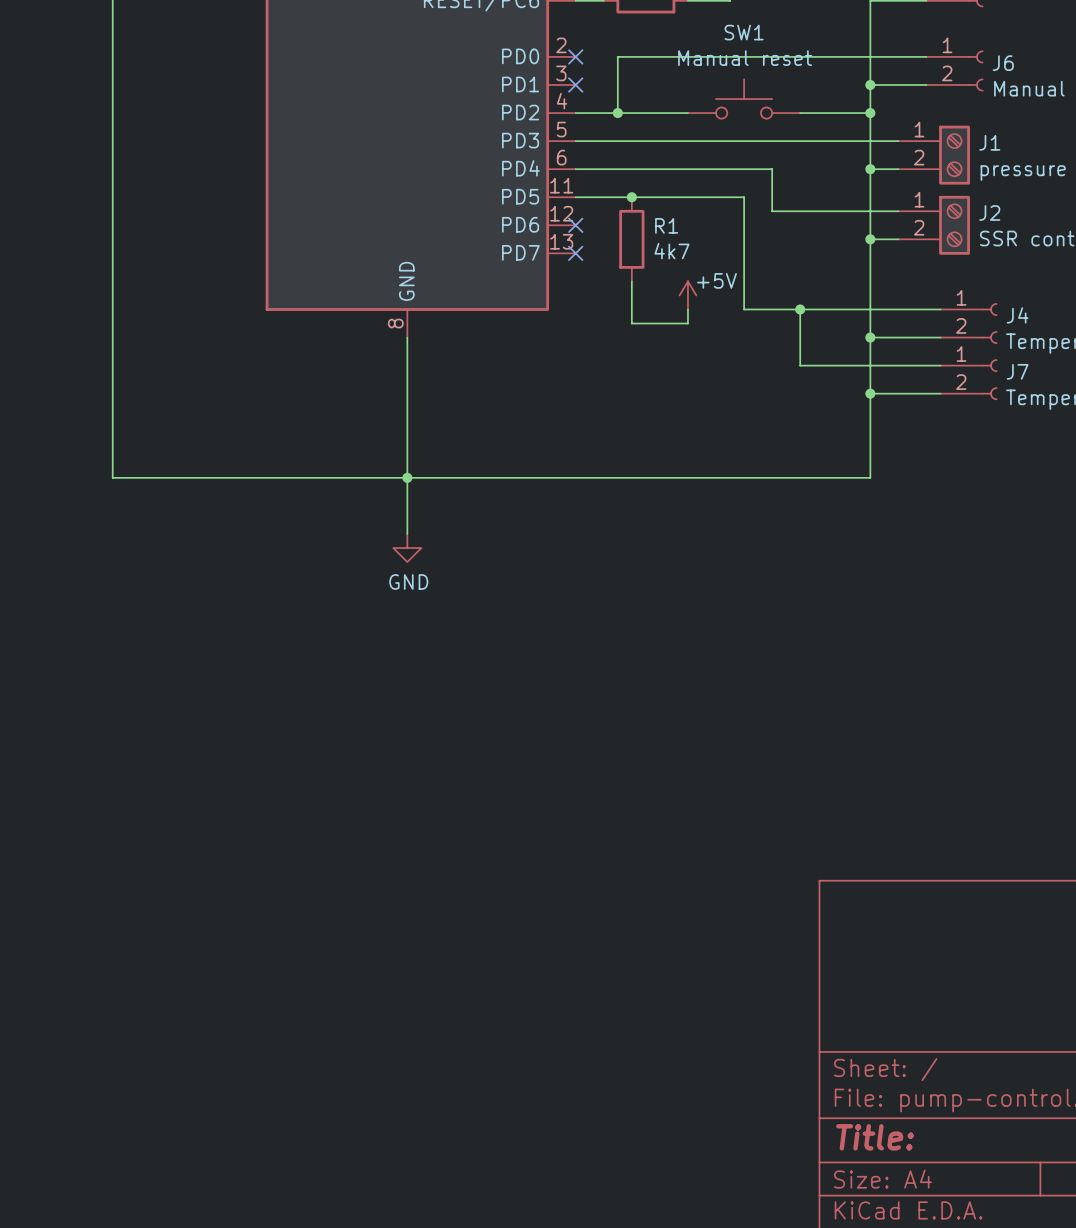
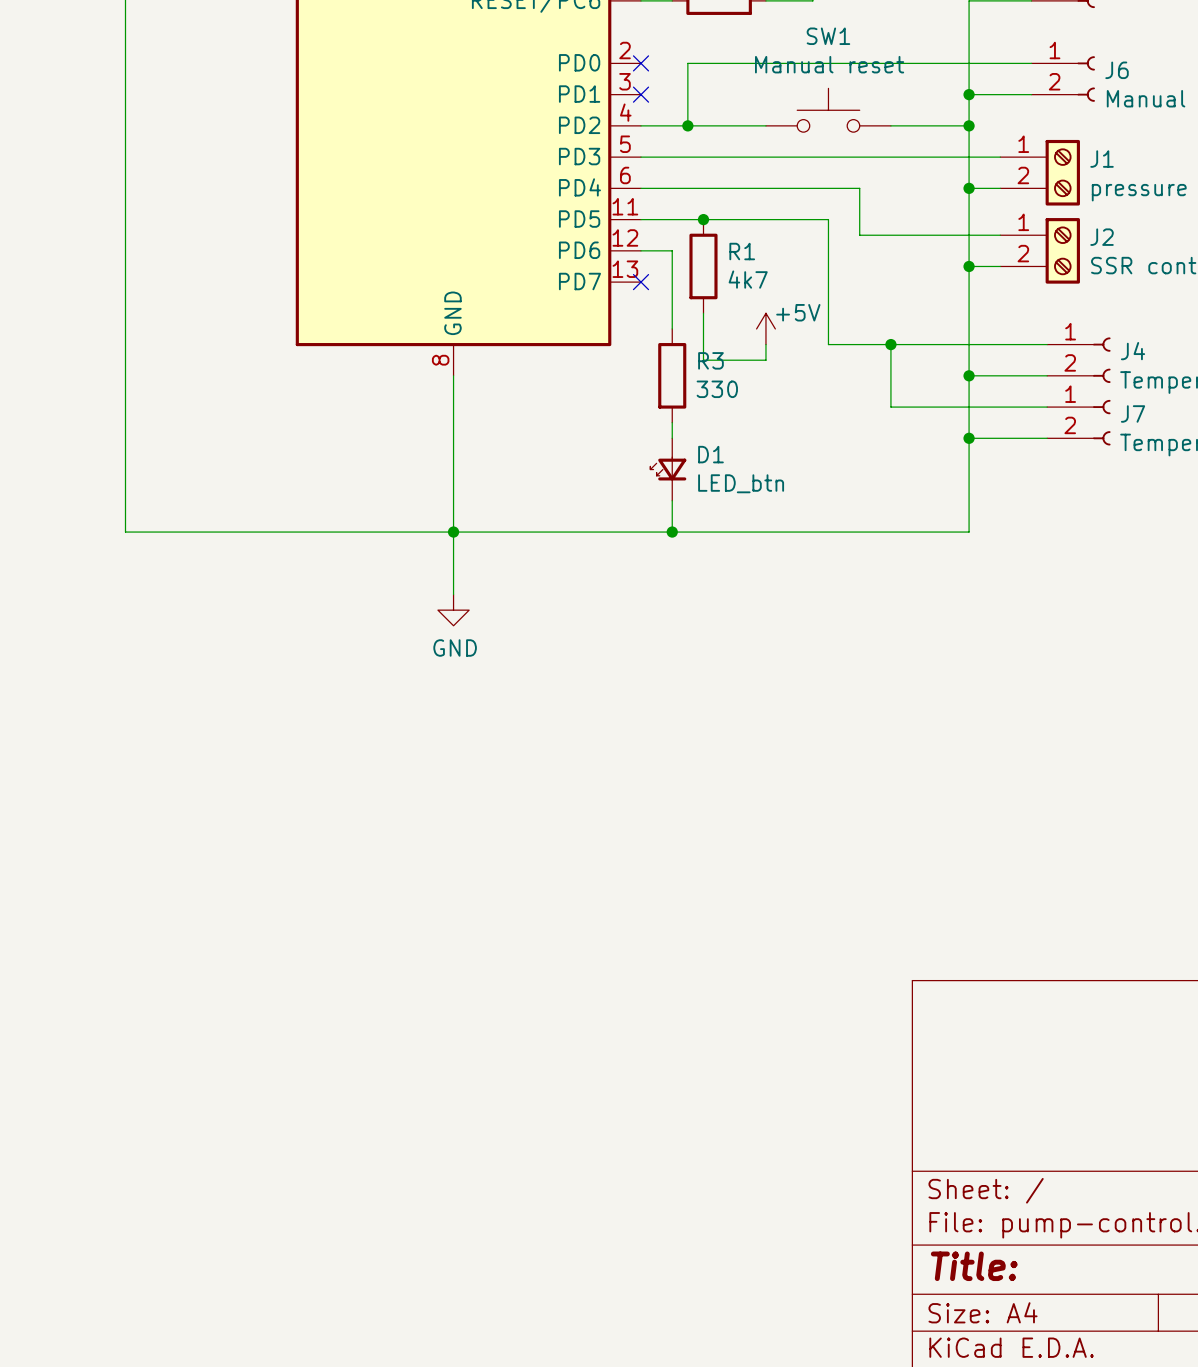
wire: none -> (641, 250) (672, 250) (672, 328)
no-connect mark: (575, 225) -> none
R3: none -> 330 (672, 375)
wire: none -> (672, 422) (672, 438)
D1: none -> LED_btn (668, 469)
wire: none -> (672, 500) (672, 532)
junction: none -> (672, 532)

